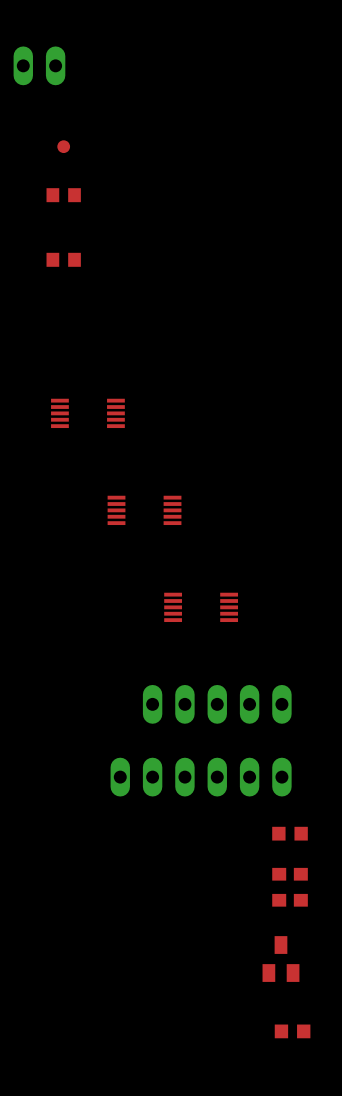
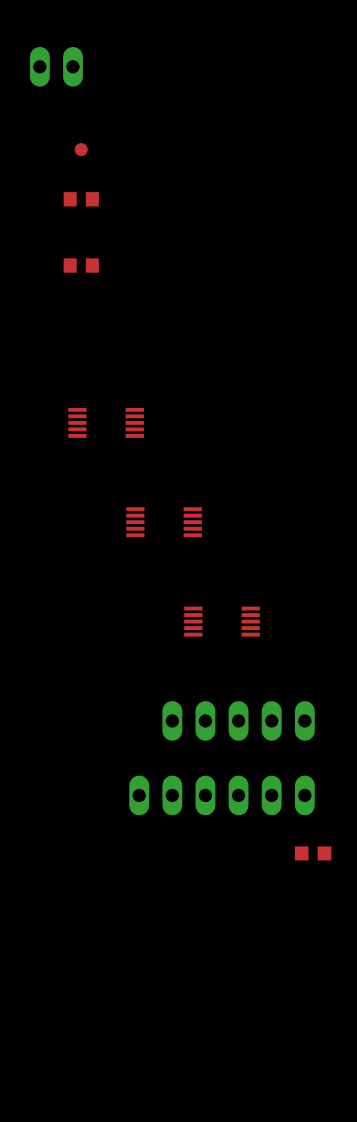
part: (290, 874) -> none
part: (290, 900) -> none
part: (280, 959) -> none
part: (292, 1031) -> none

